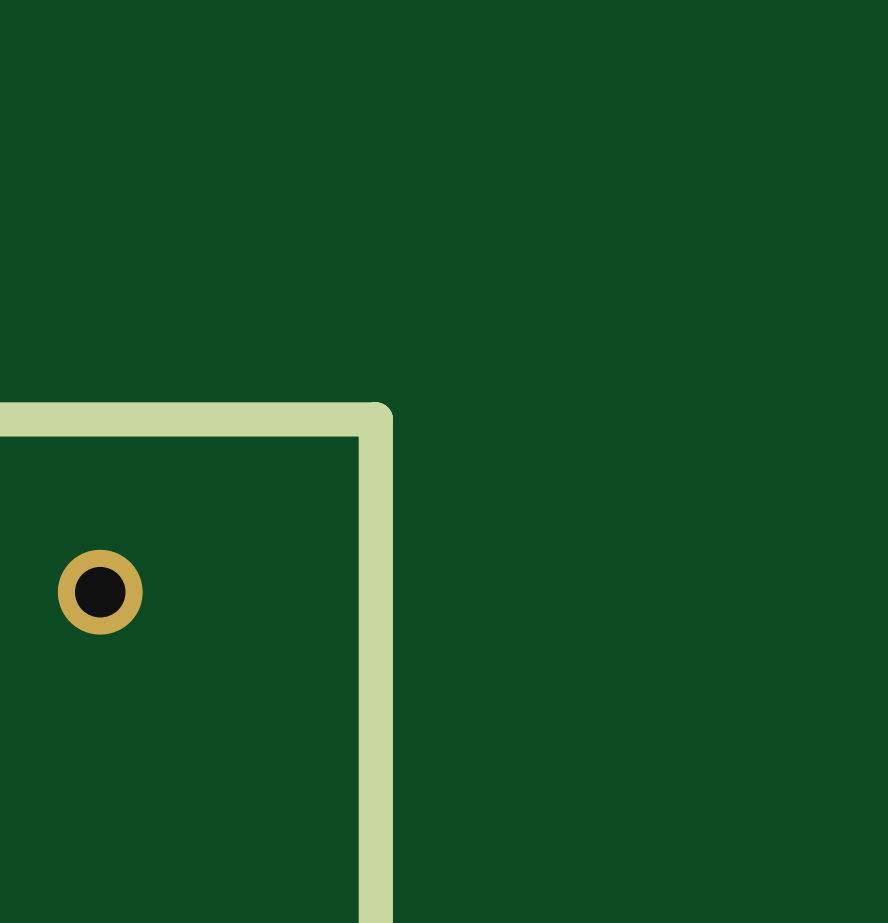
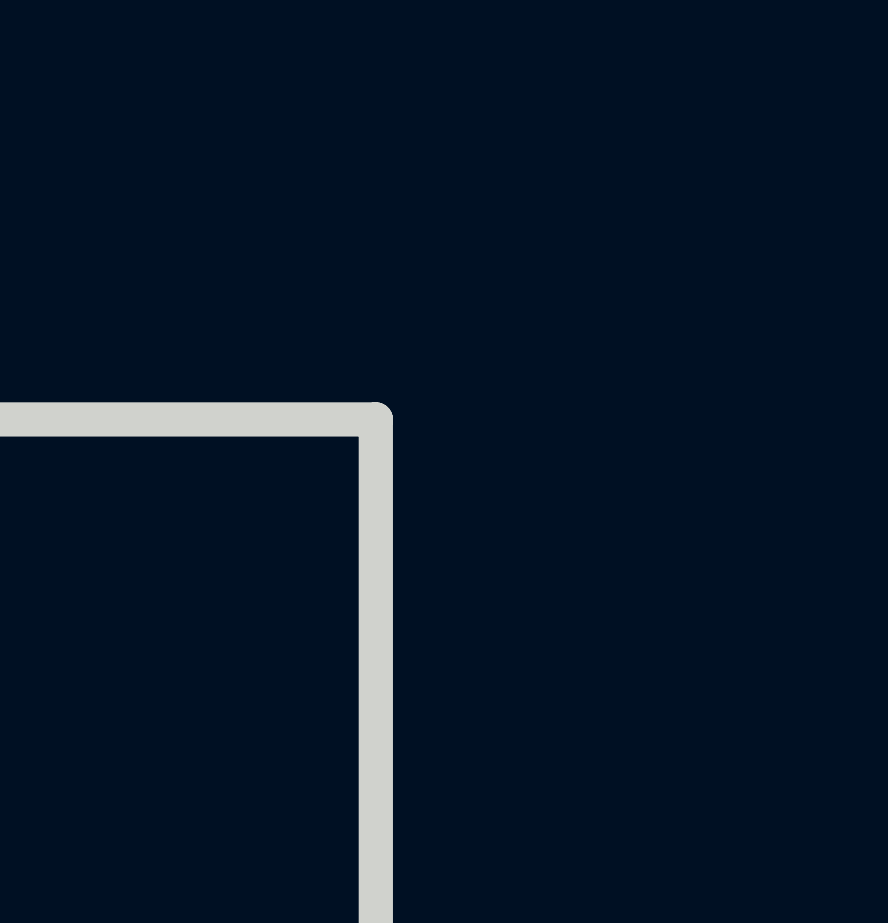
via: (100, 592) -> none

